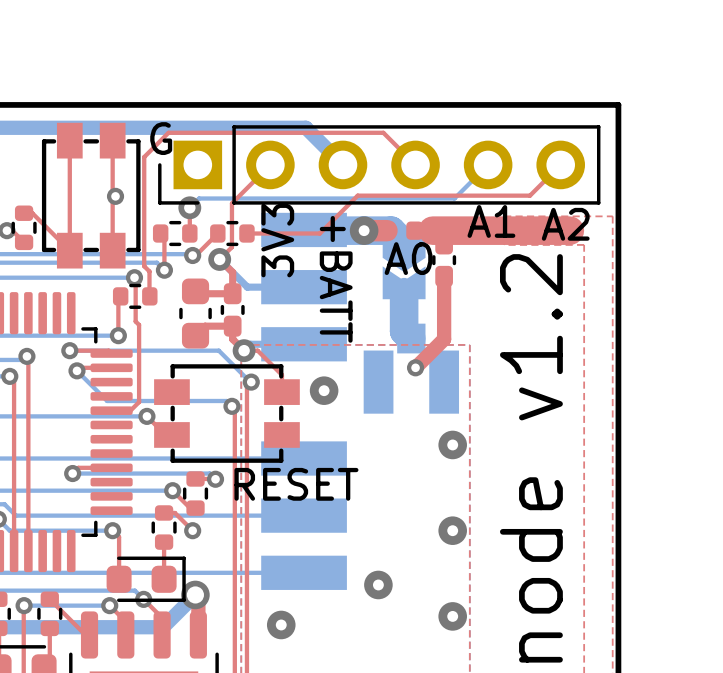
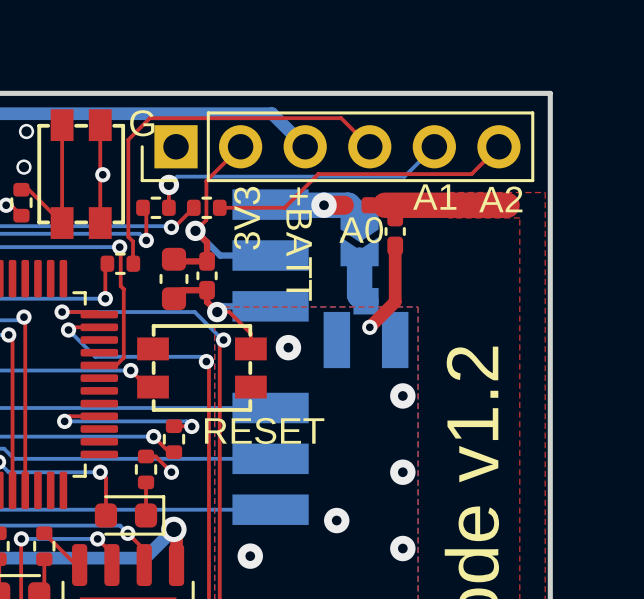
via: none -> (26, 131)
via: none -> (23, 167)

